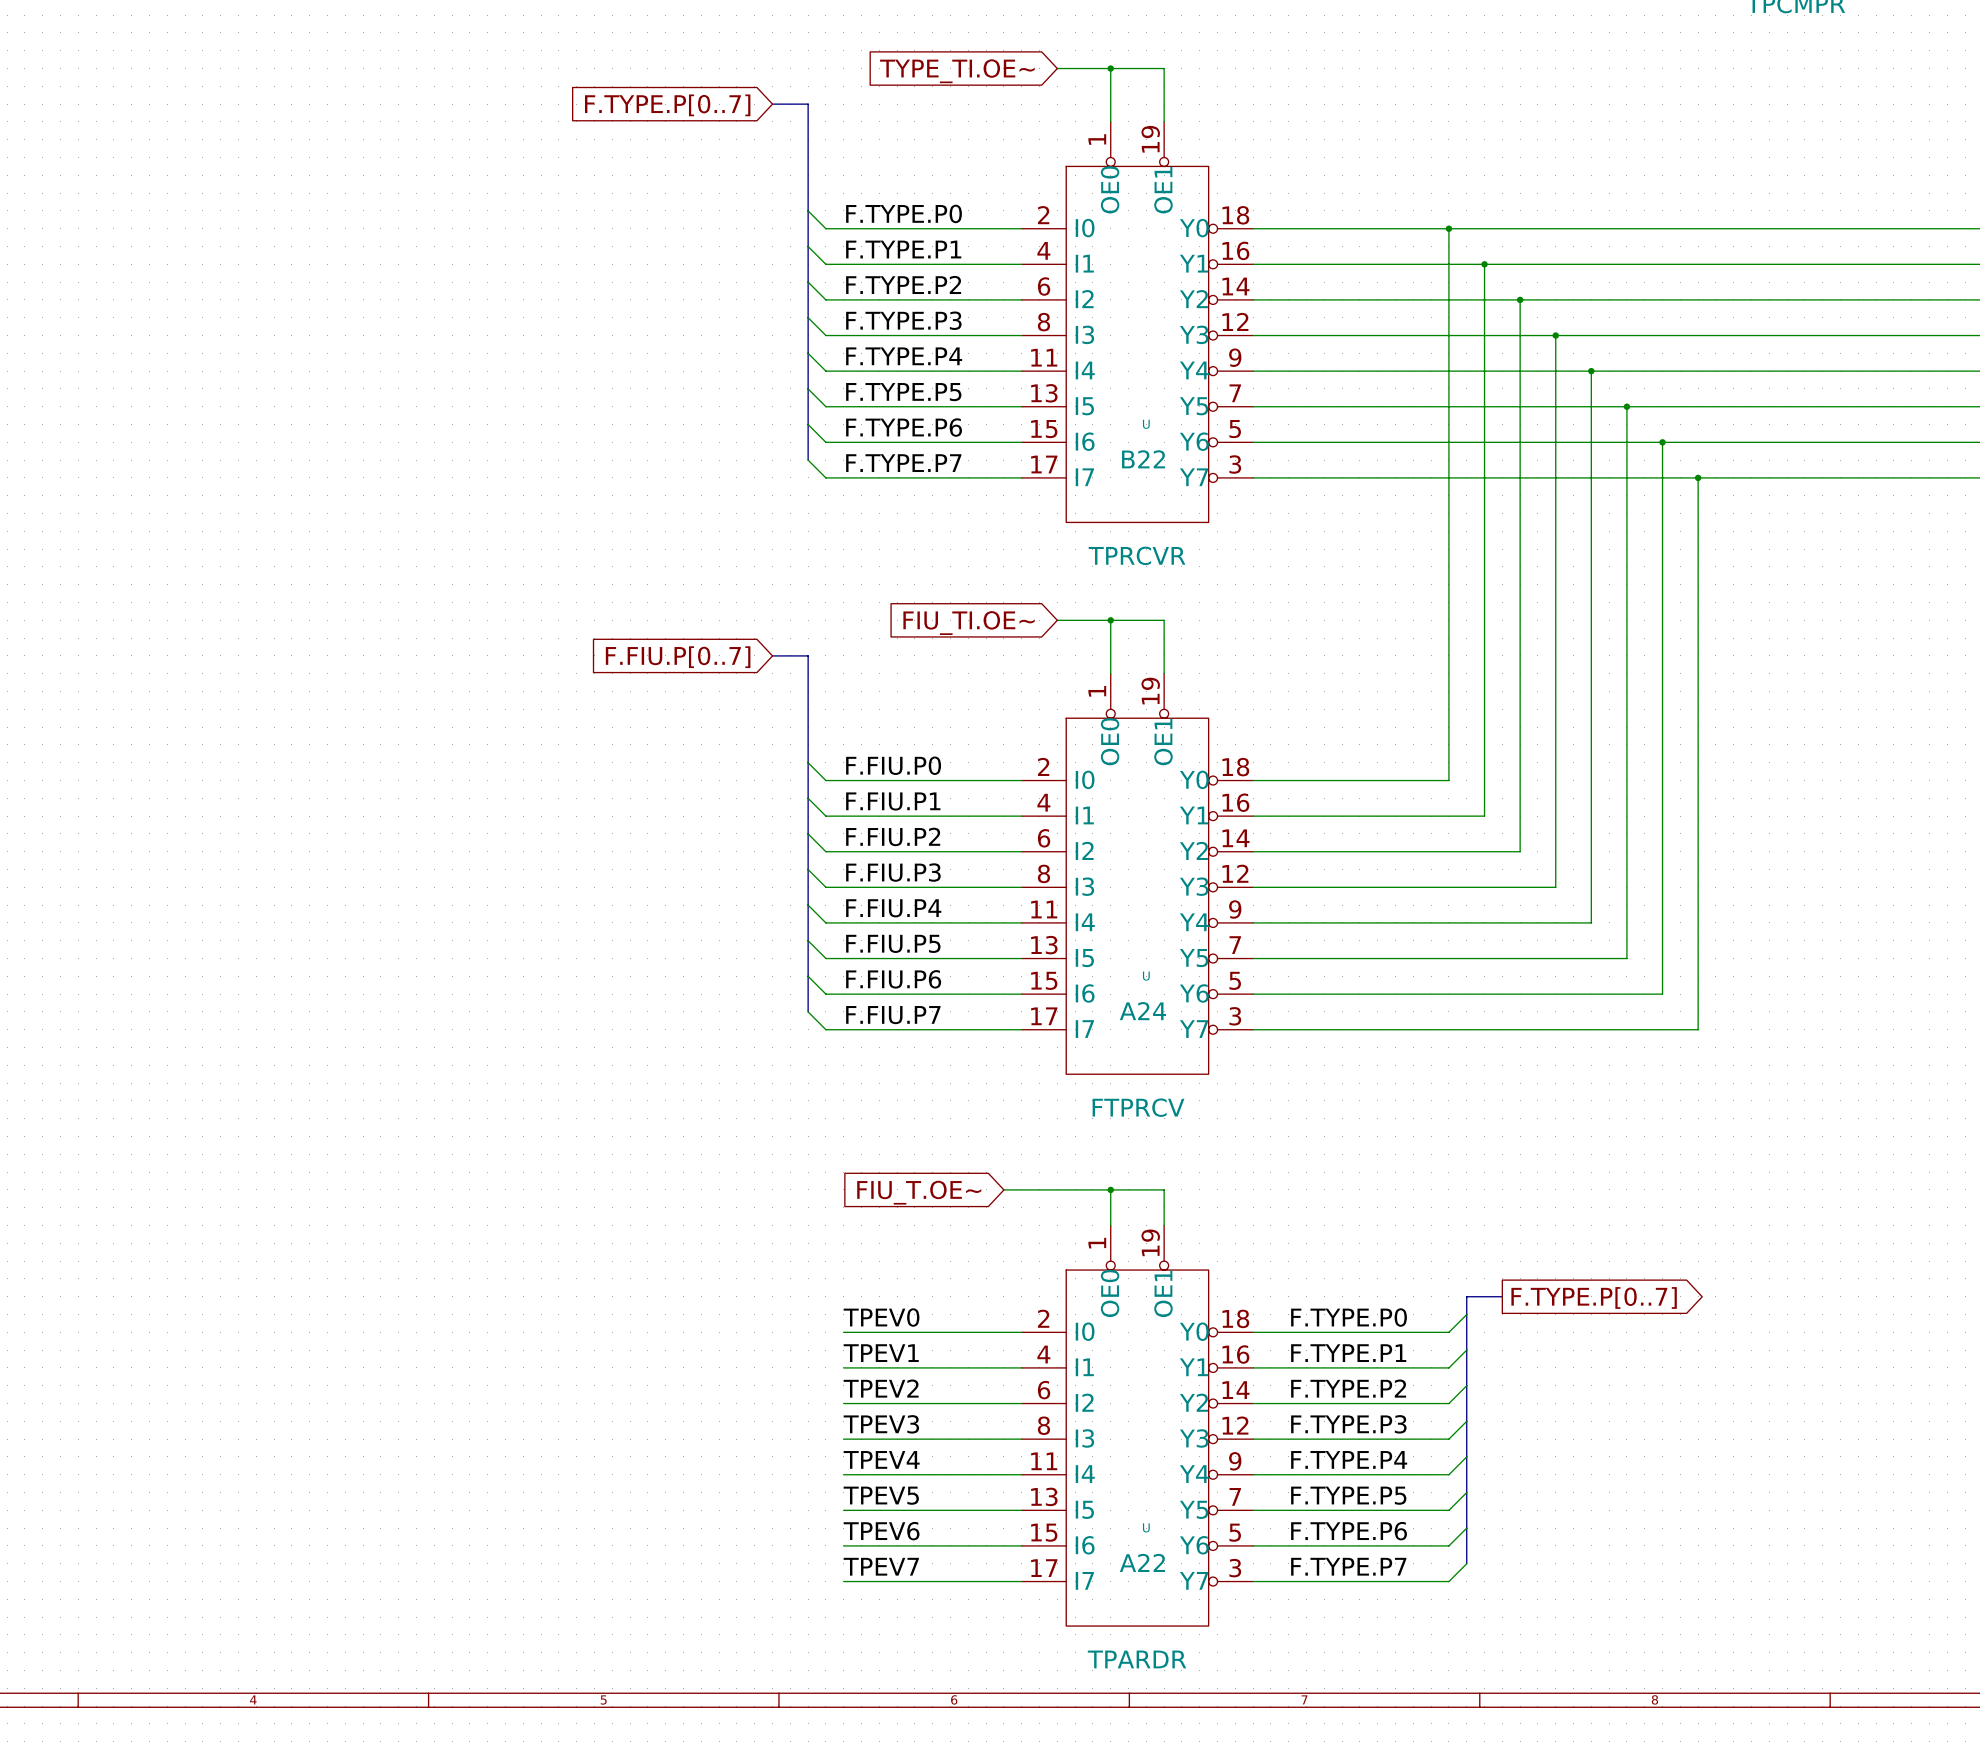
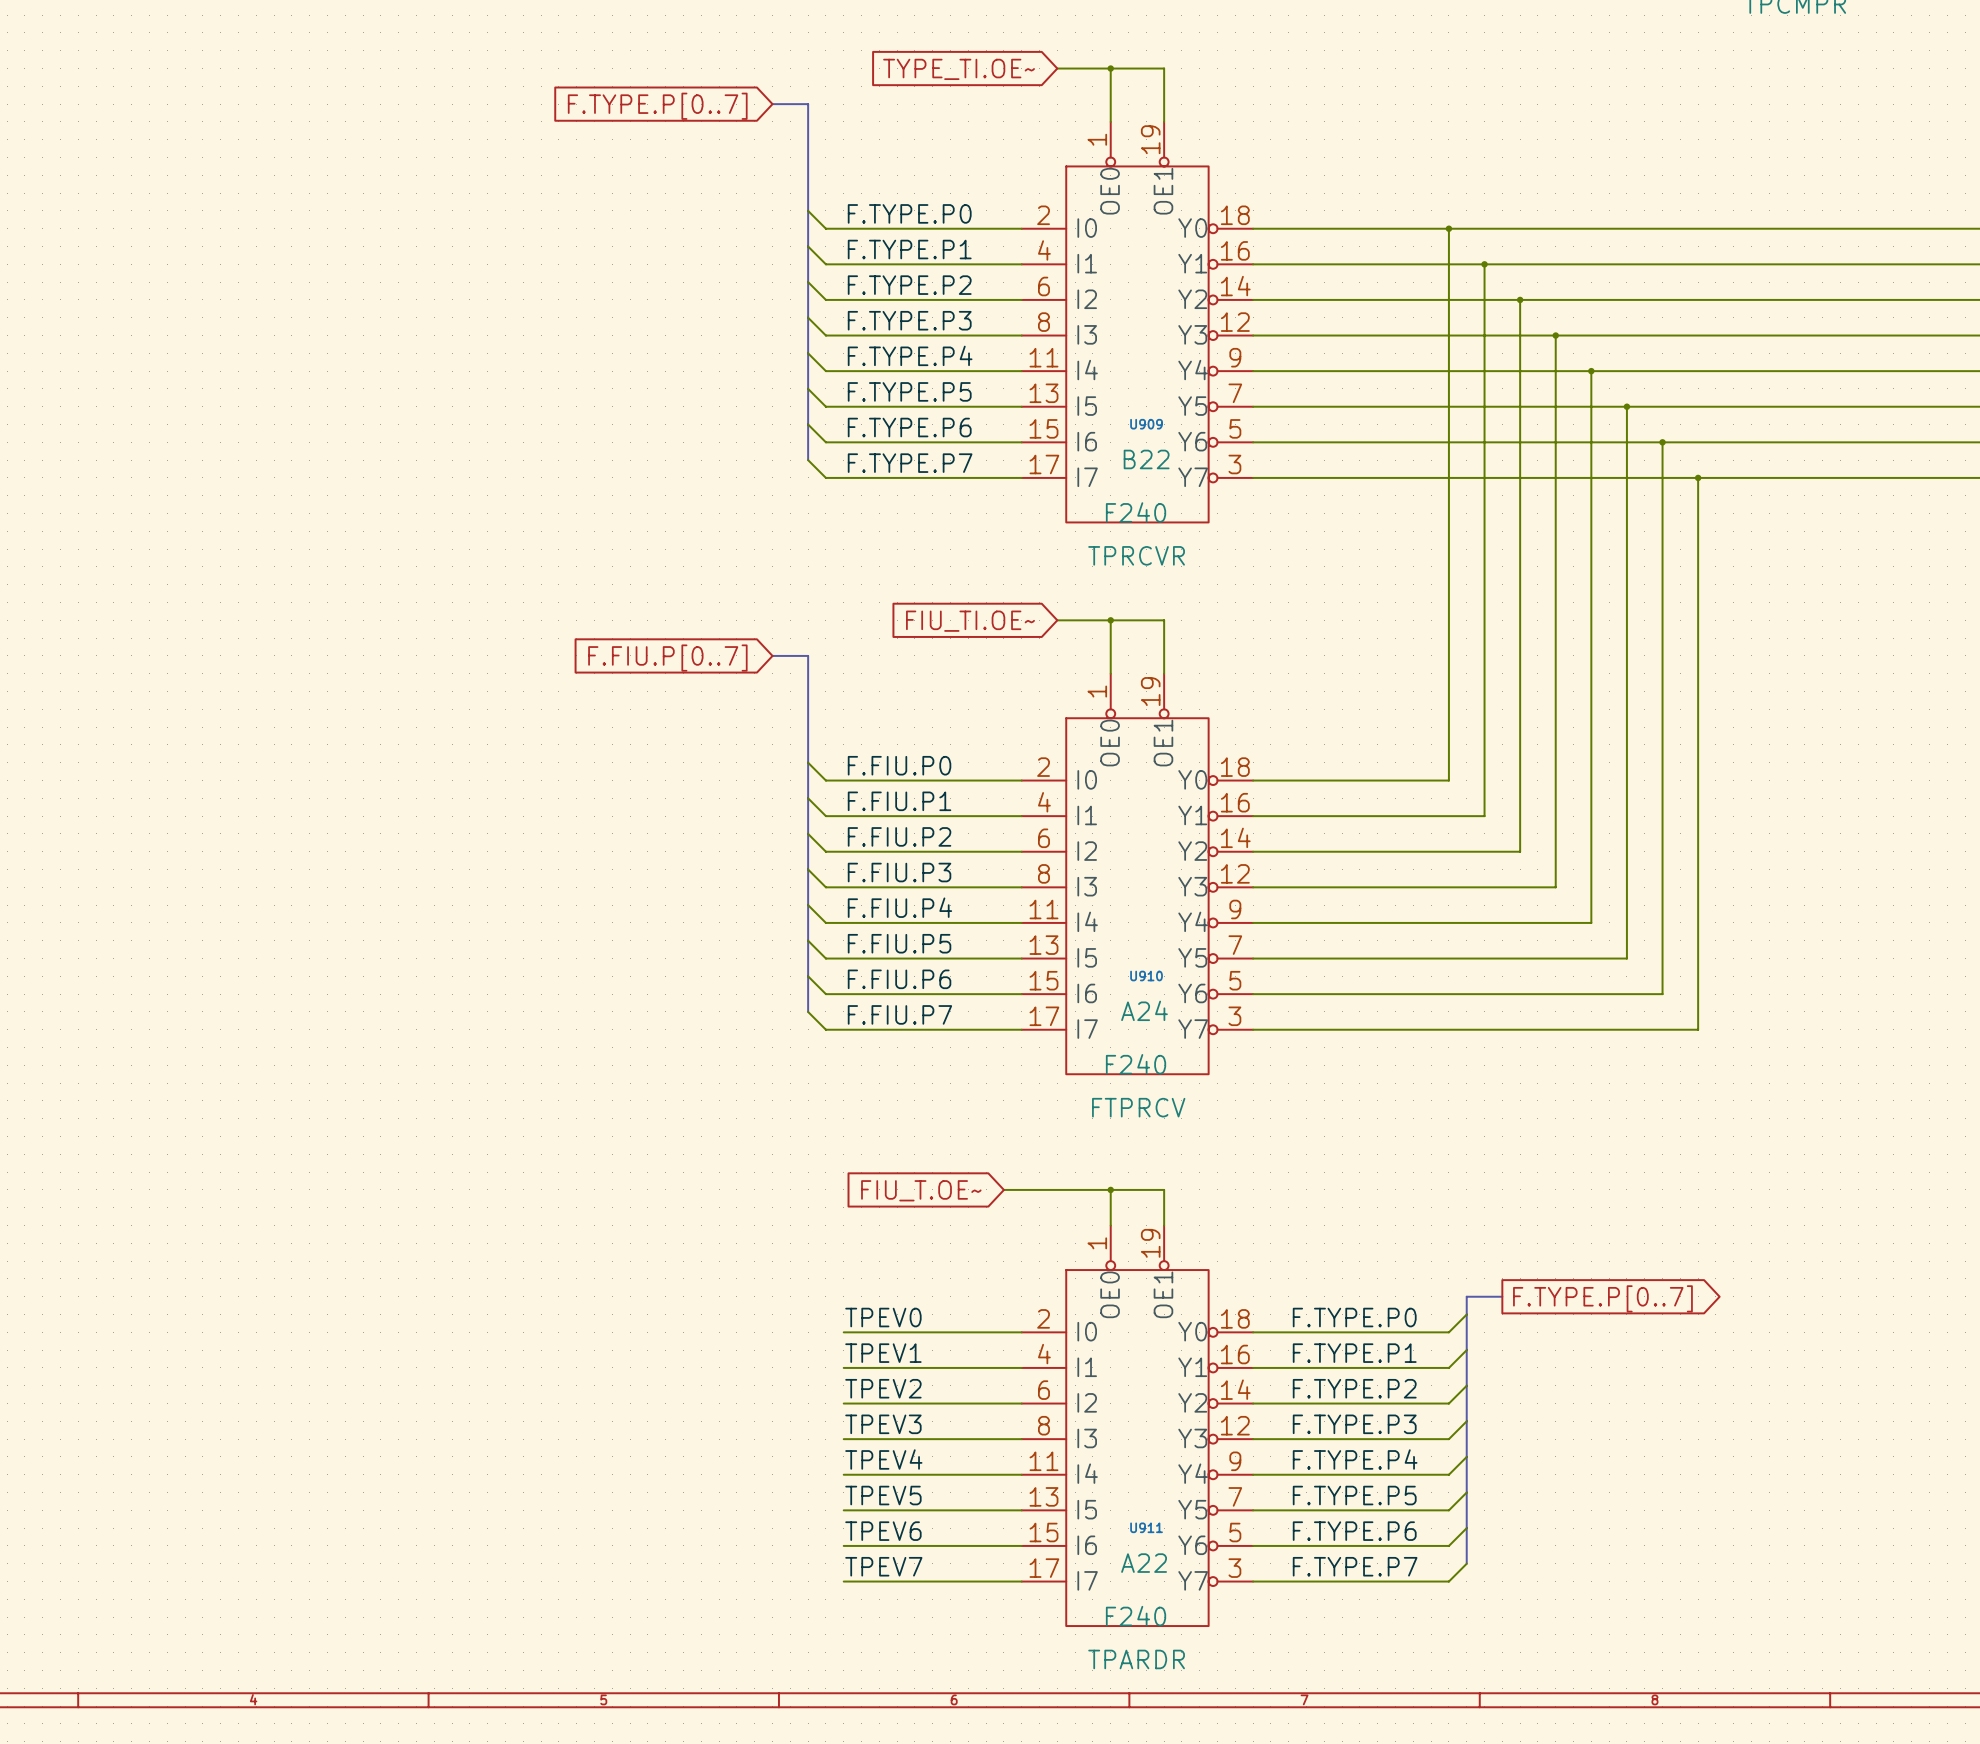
U name: U (1146, 424) -> U909 (1146, 424)
U value: none -> F240 (1136, 512)
U name: U (1146, 976) -> U910 (1146, 976)
U value: none -> F240 (1136, 1064)
U name: U (1146, 1527) -> U911 (1146, 1527)
U value: none -> F240 (1136, 1616)

